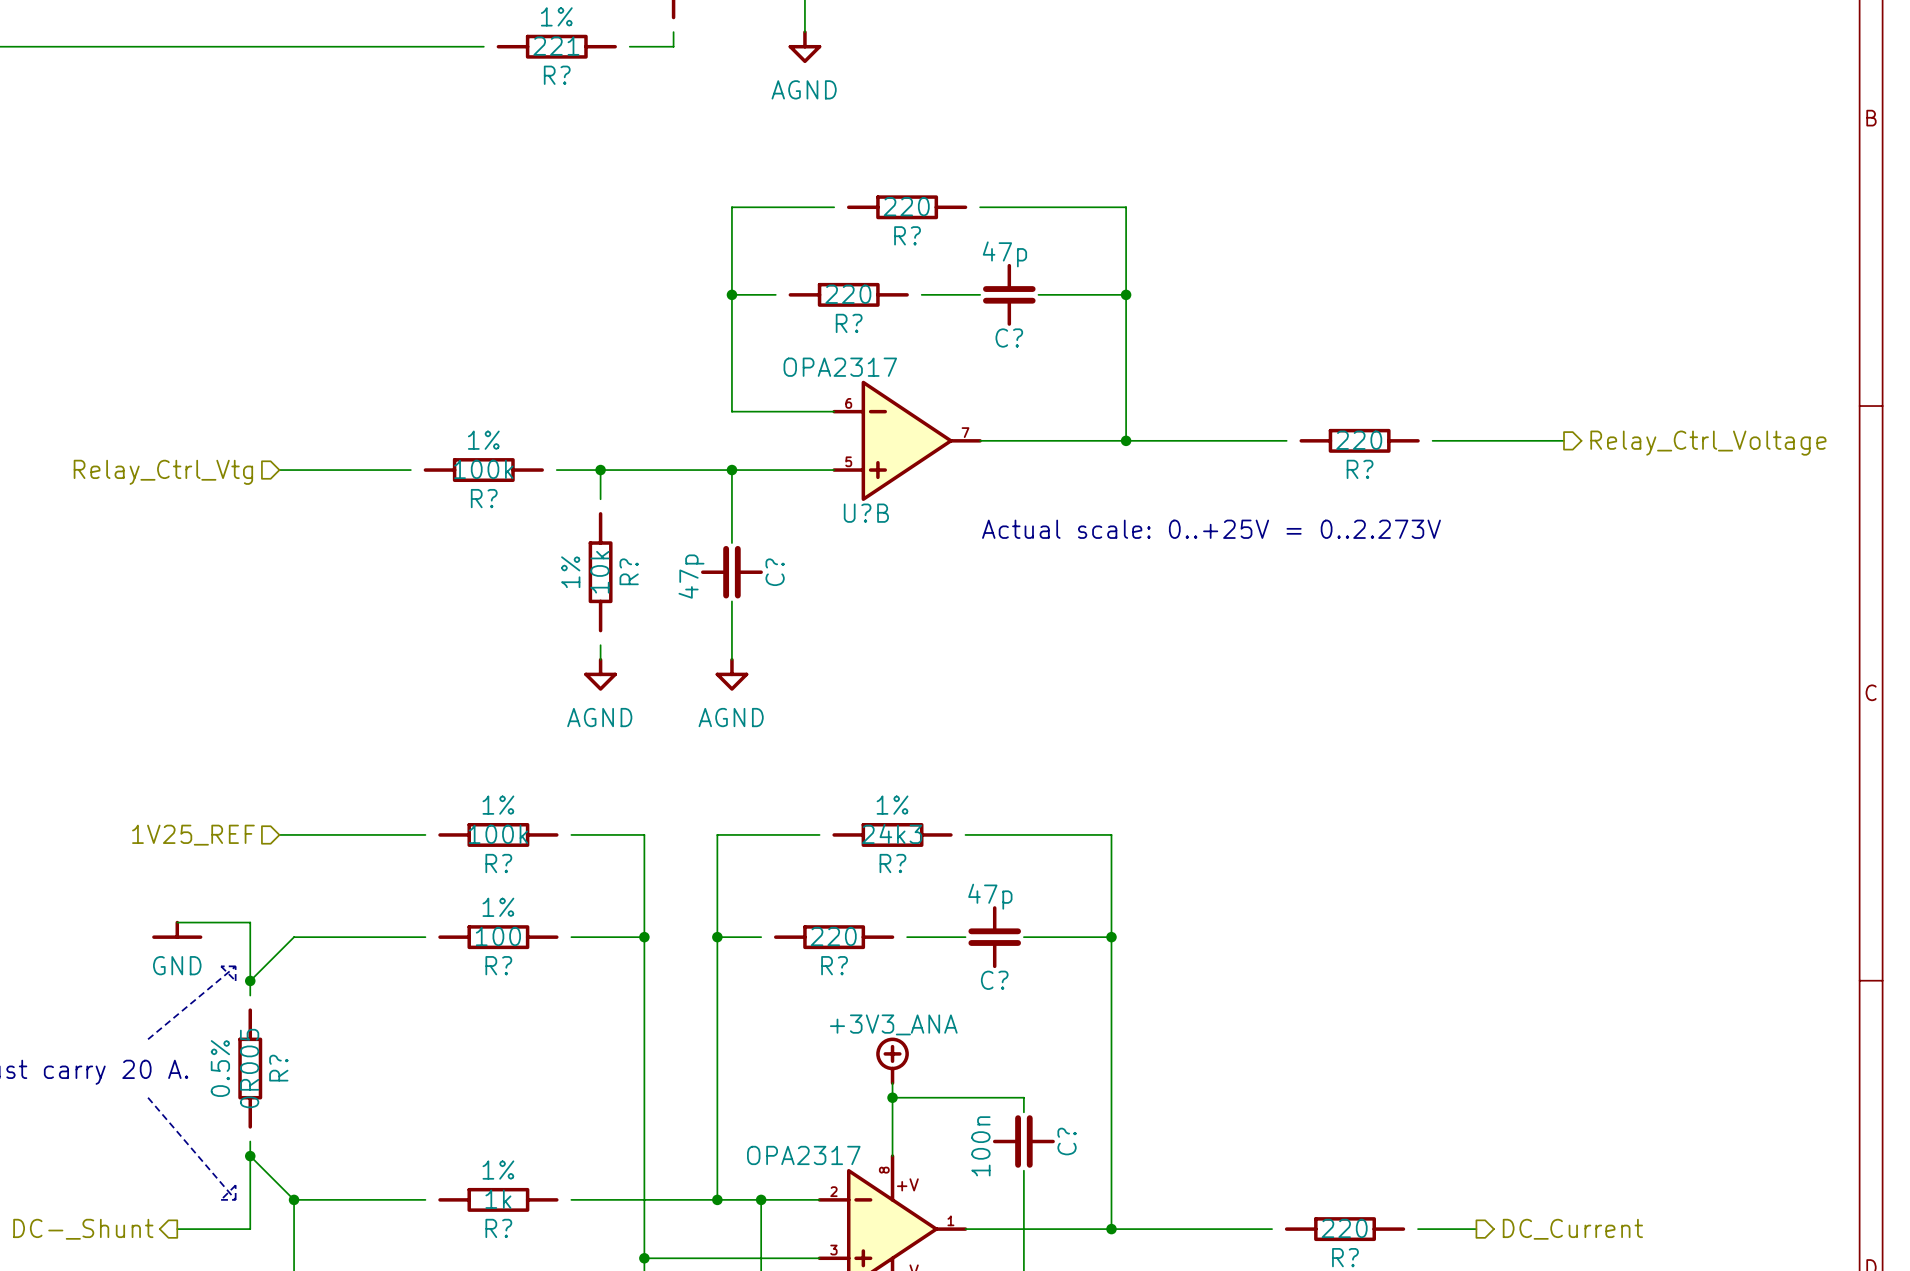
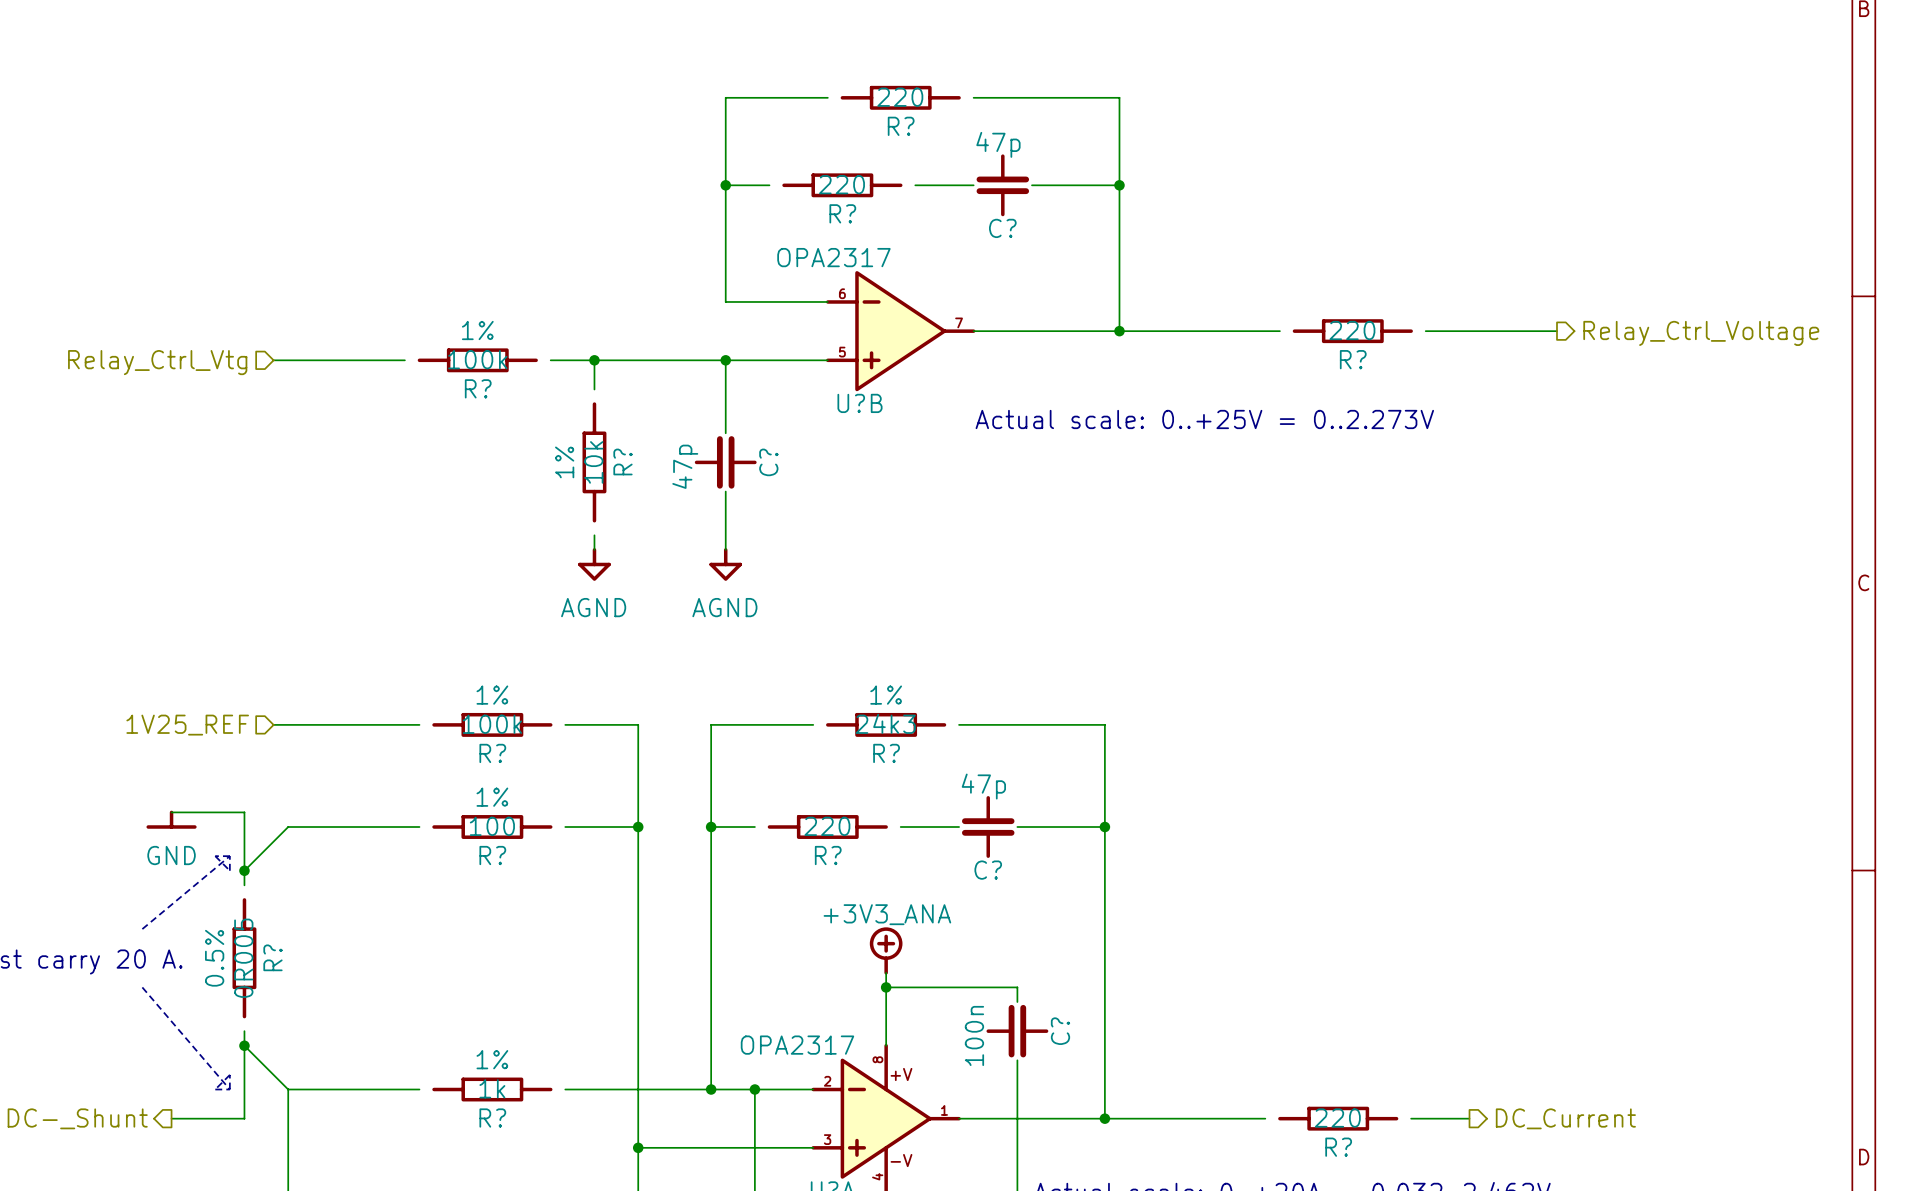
junction: (294, 1199) -> none

